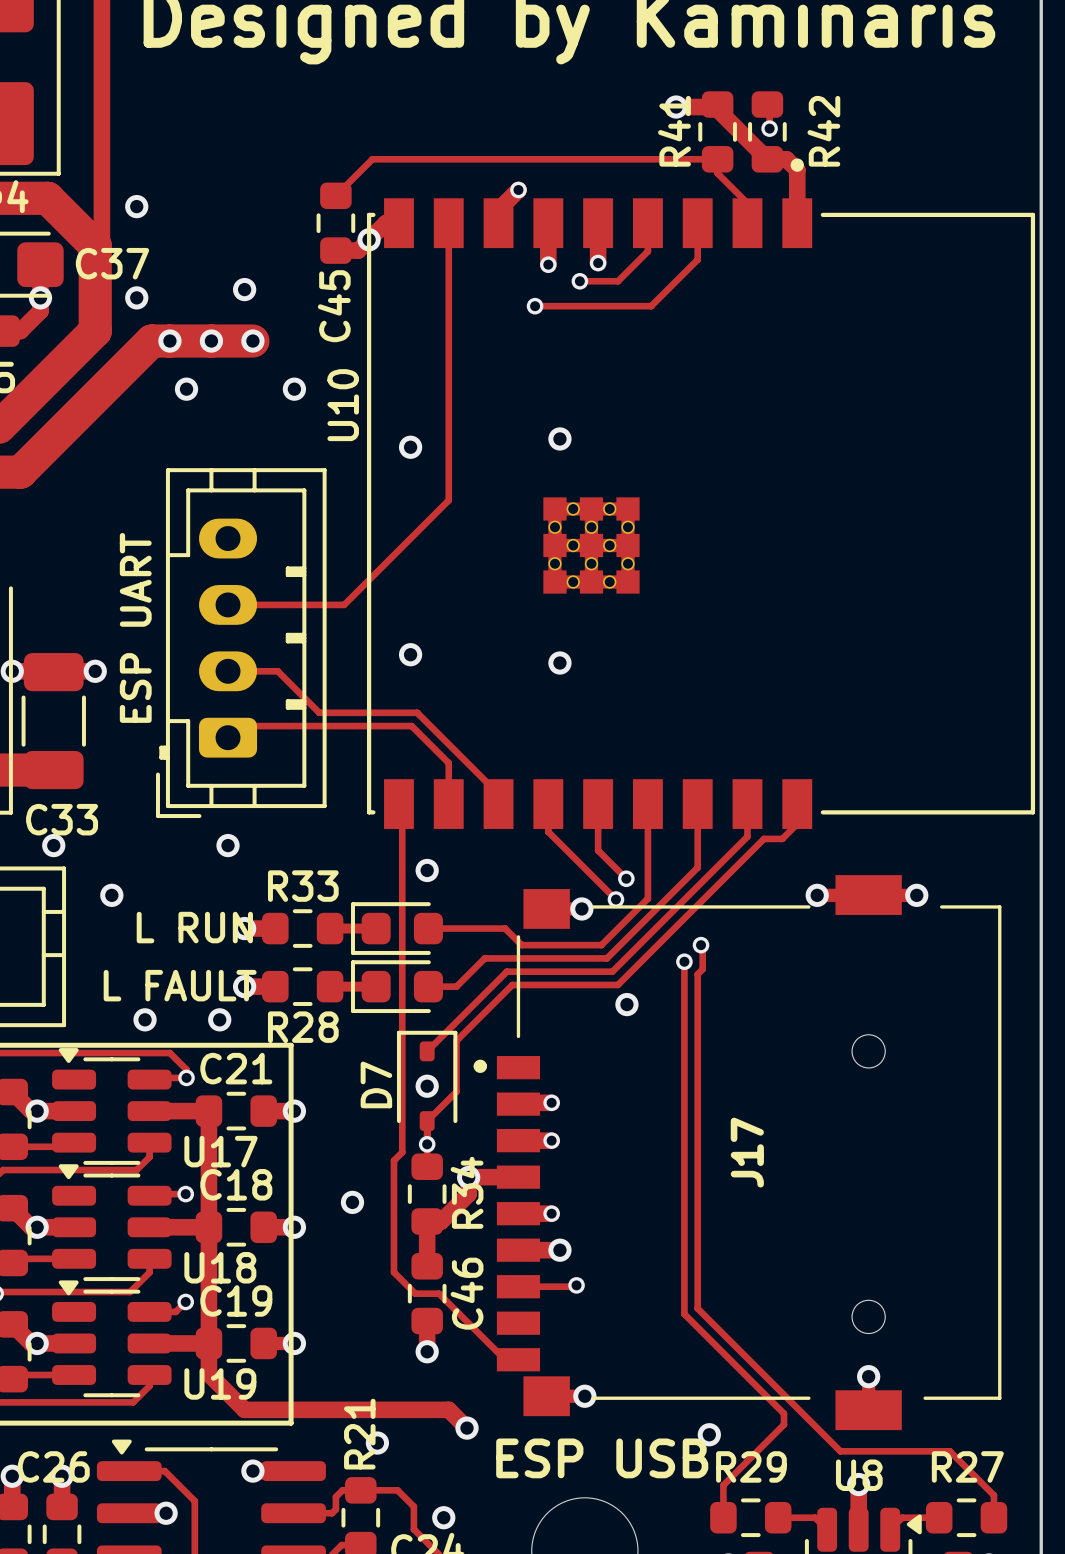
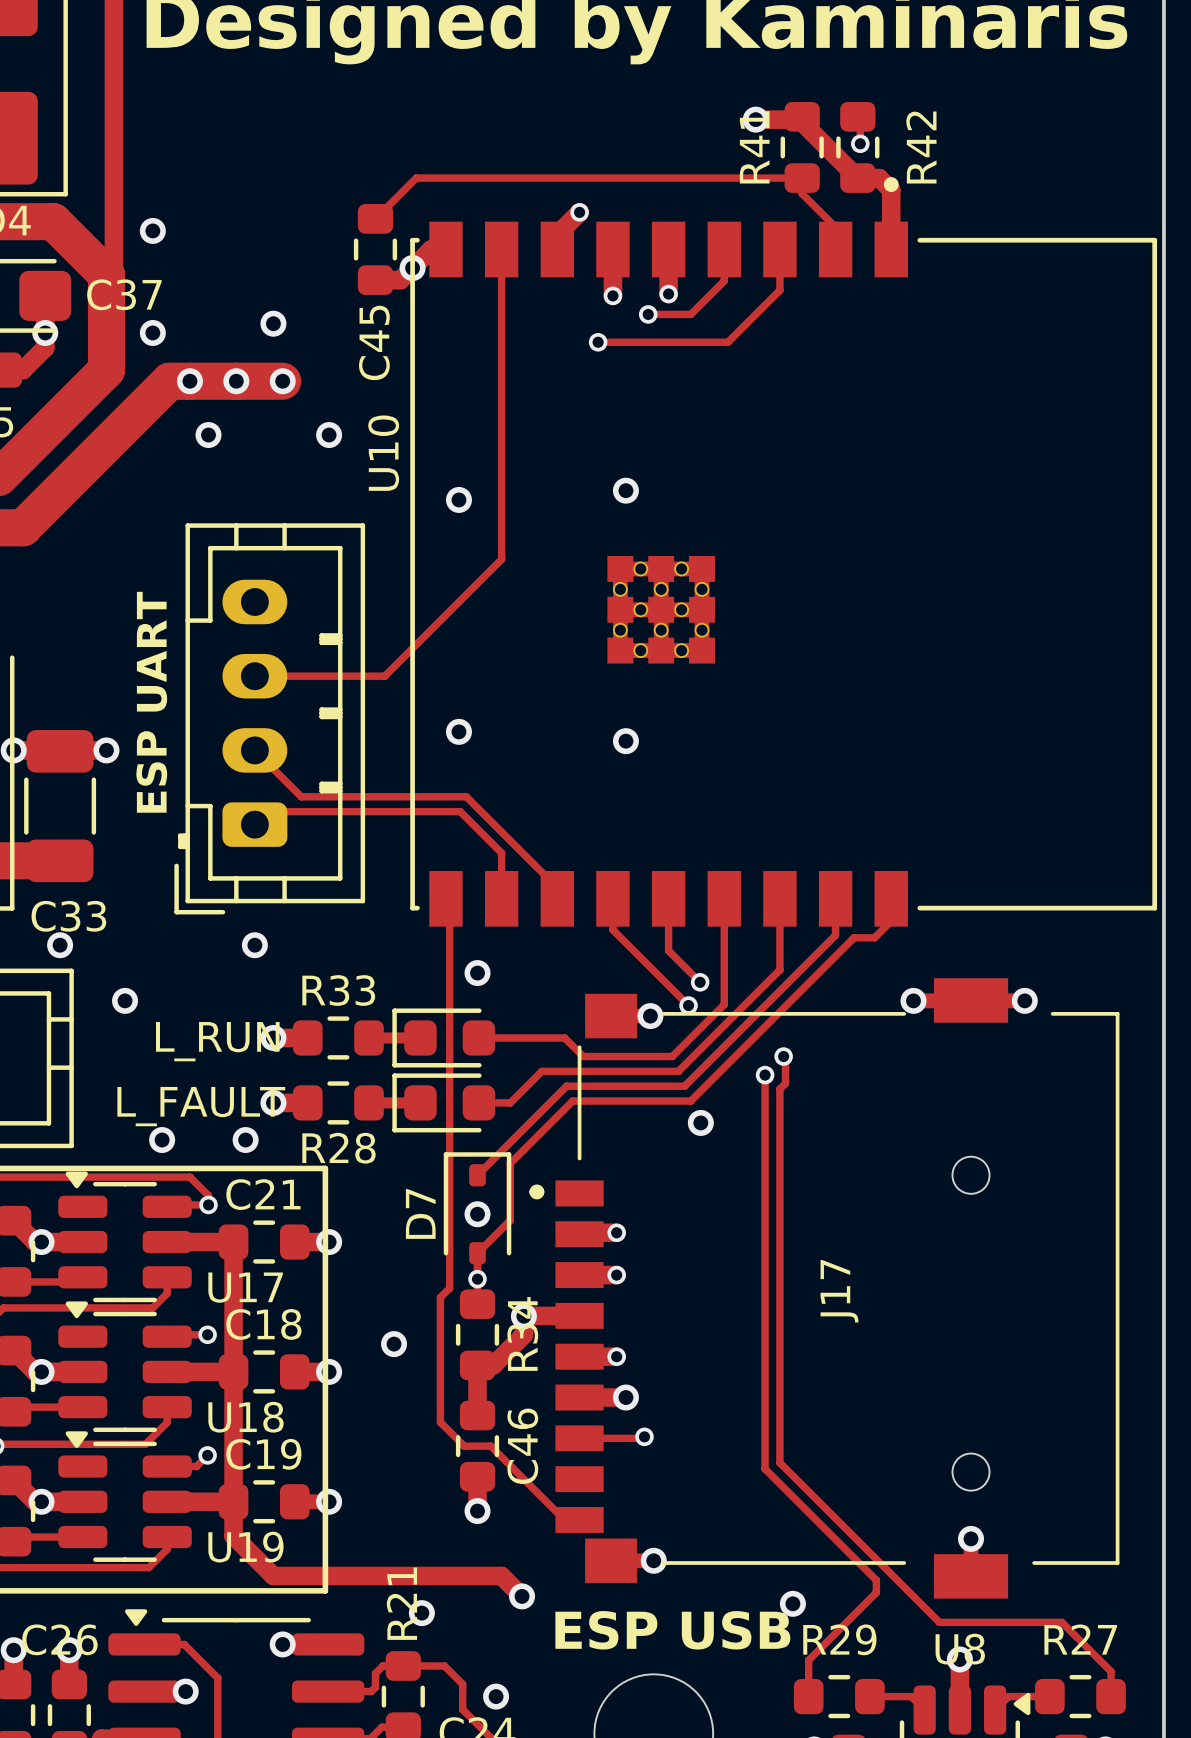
track: (228, 671) (277, 671) (319, 712) -> (254, 750) (301, 796) (356, 796)
part value: L RUN (194, 927) -> L_RUN (217, 1041)
part value: L FAULT (180, 985) -> L_FAULT (201, 1106)

